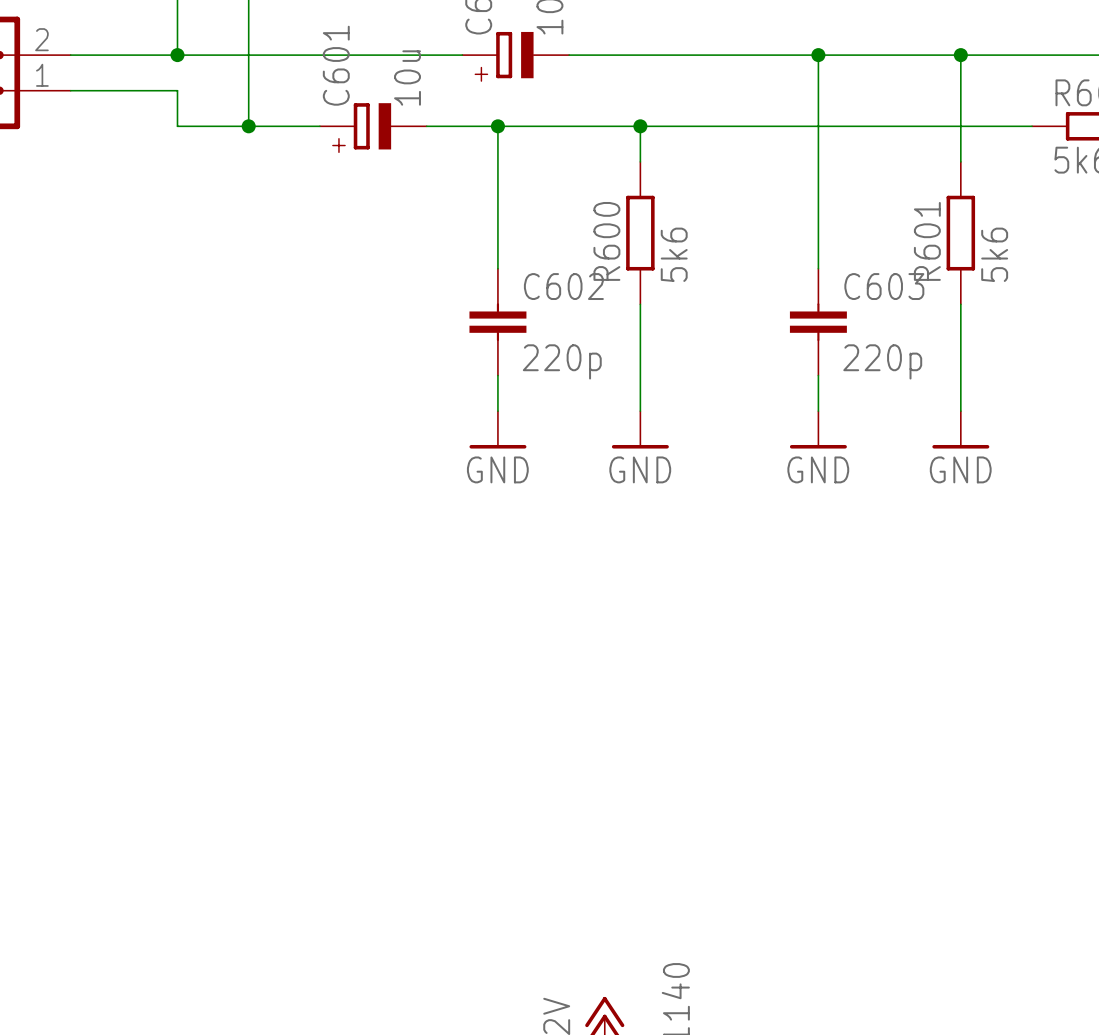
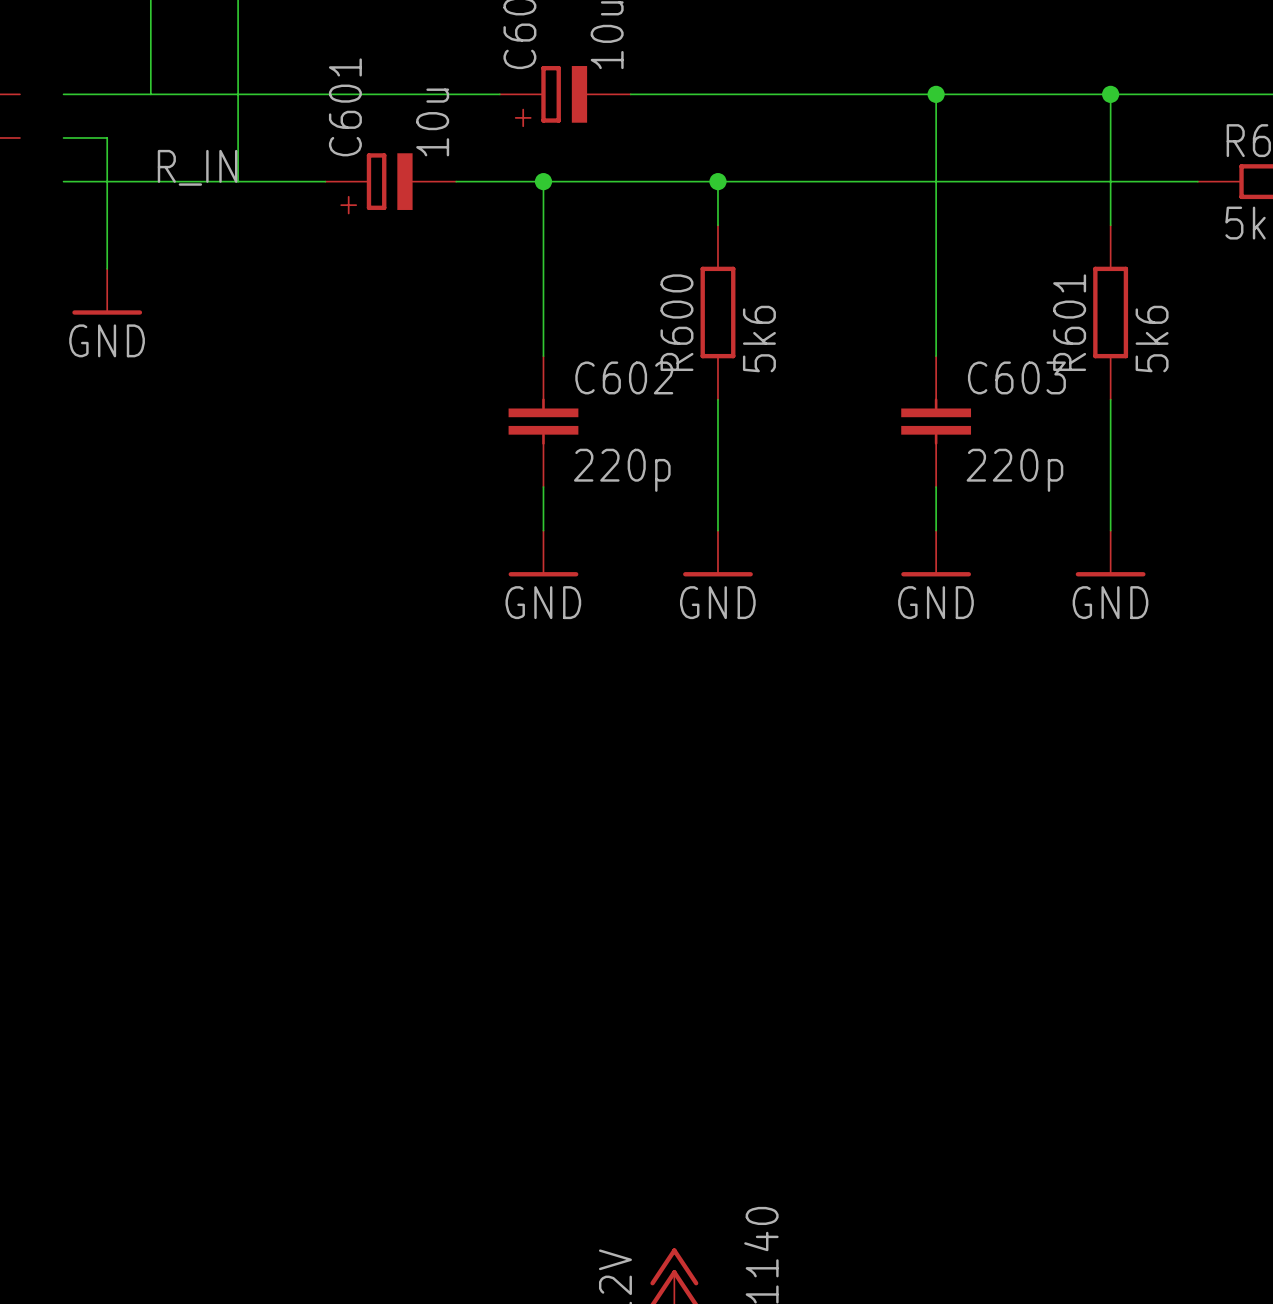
wire: (70, 55) (106, 55) -> none
junction: (177, 55) -> none
wire: (70, 90) (106, 90) -> none
wire: (141, 90) (177, 90) (177, 126) -> (63, 181) (150, 181)
wire: none -> (107, 137) (107, 268)
label: none -> R_IN (197, 167)
junction: (248, 126) -> none
power symbol: none -> GND (107, 291)

